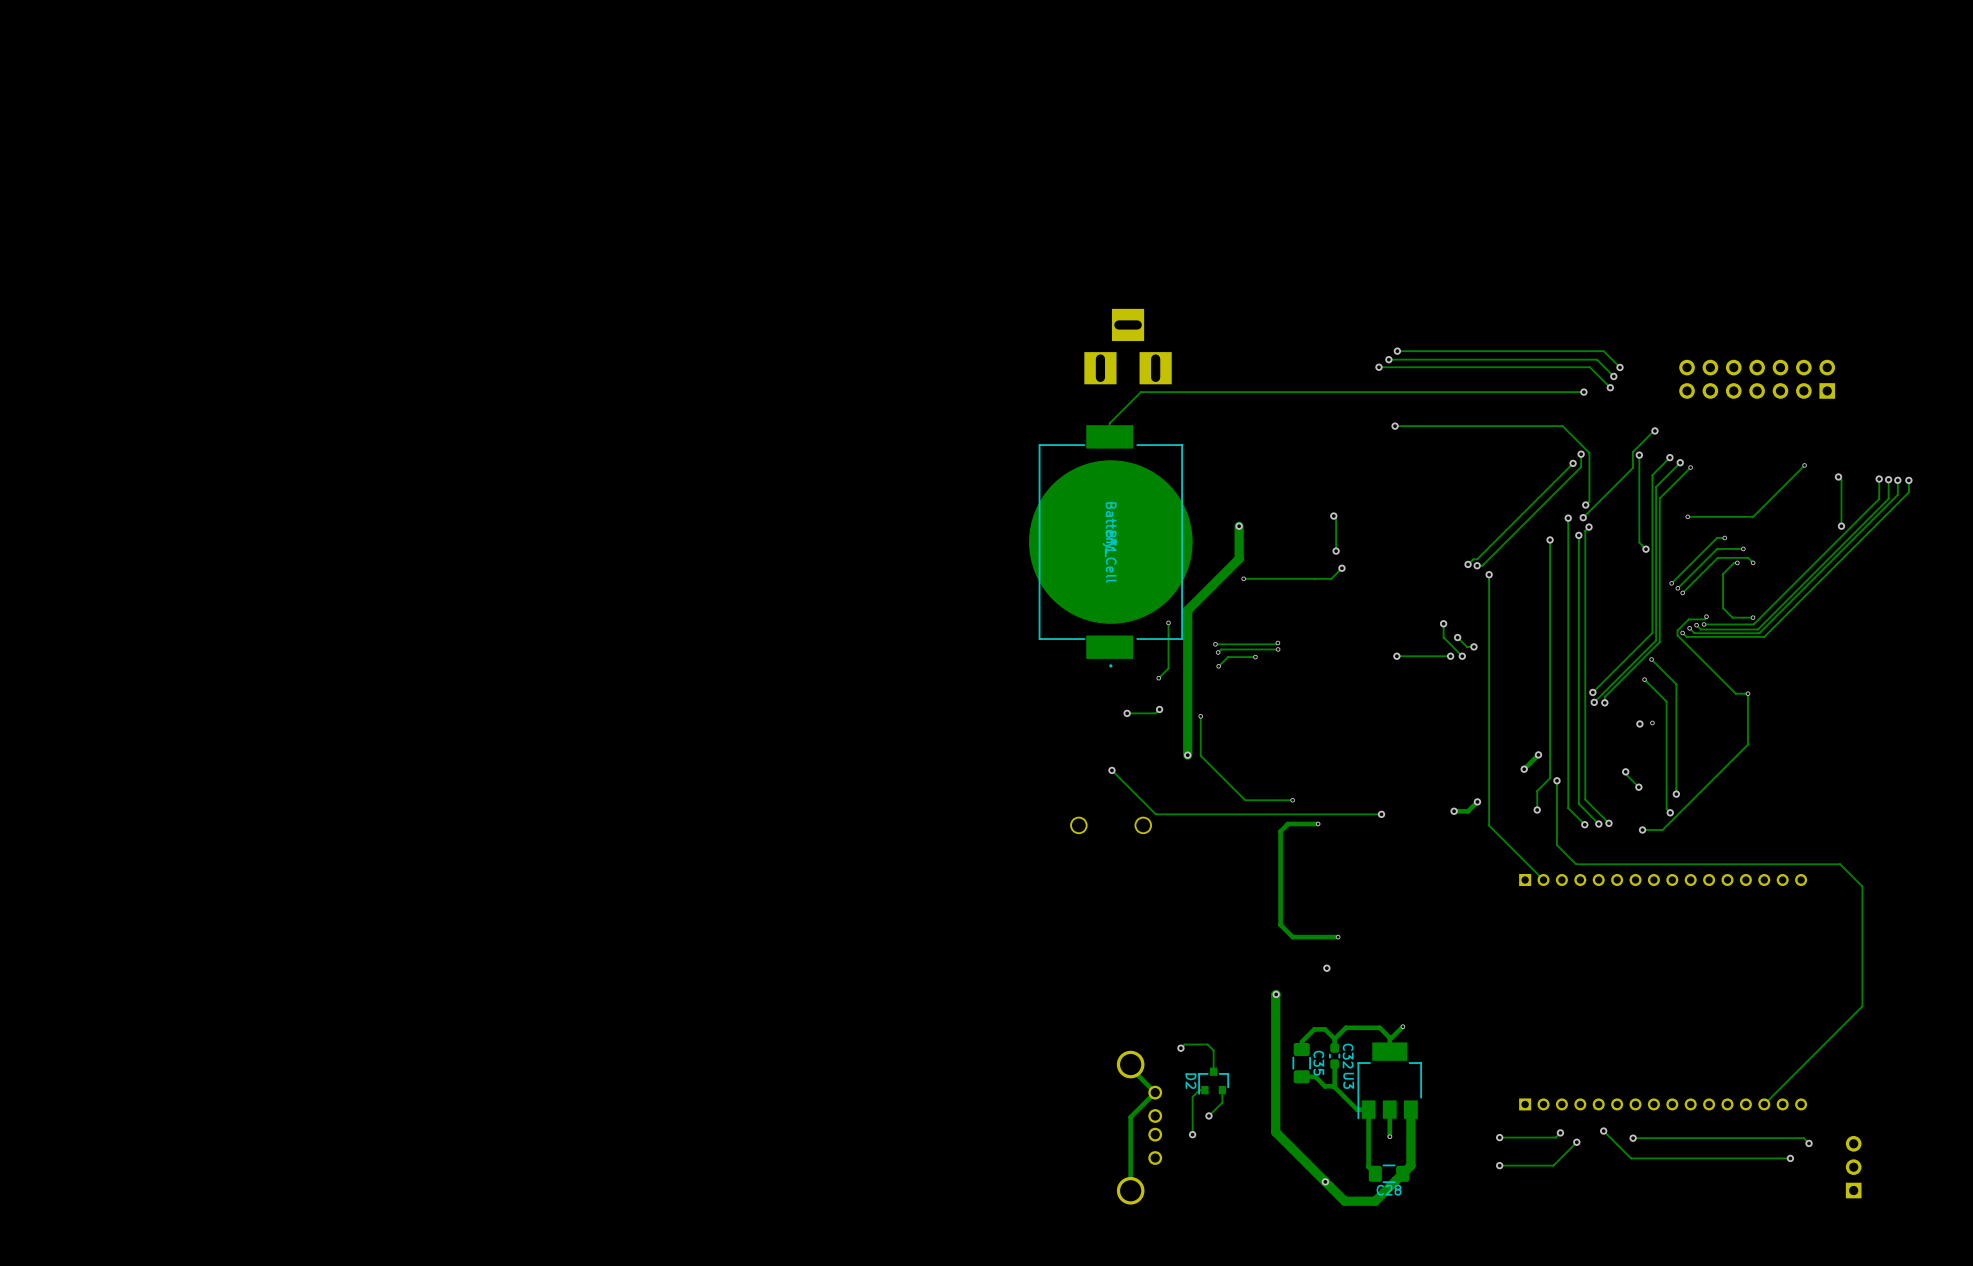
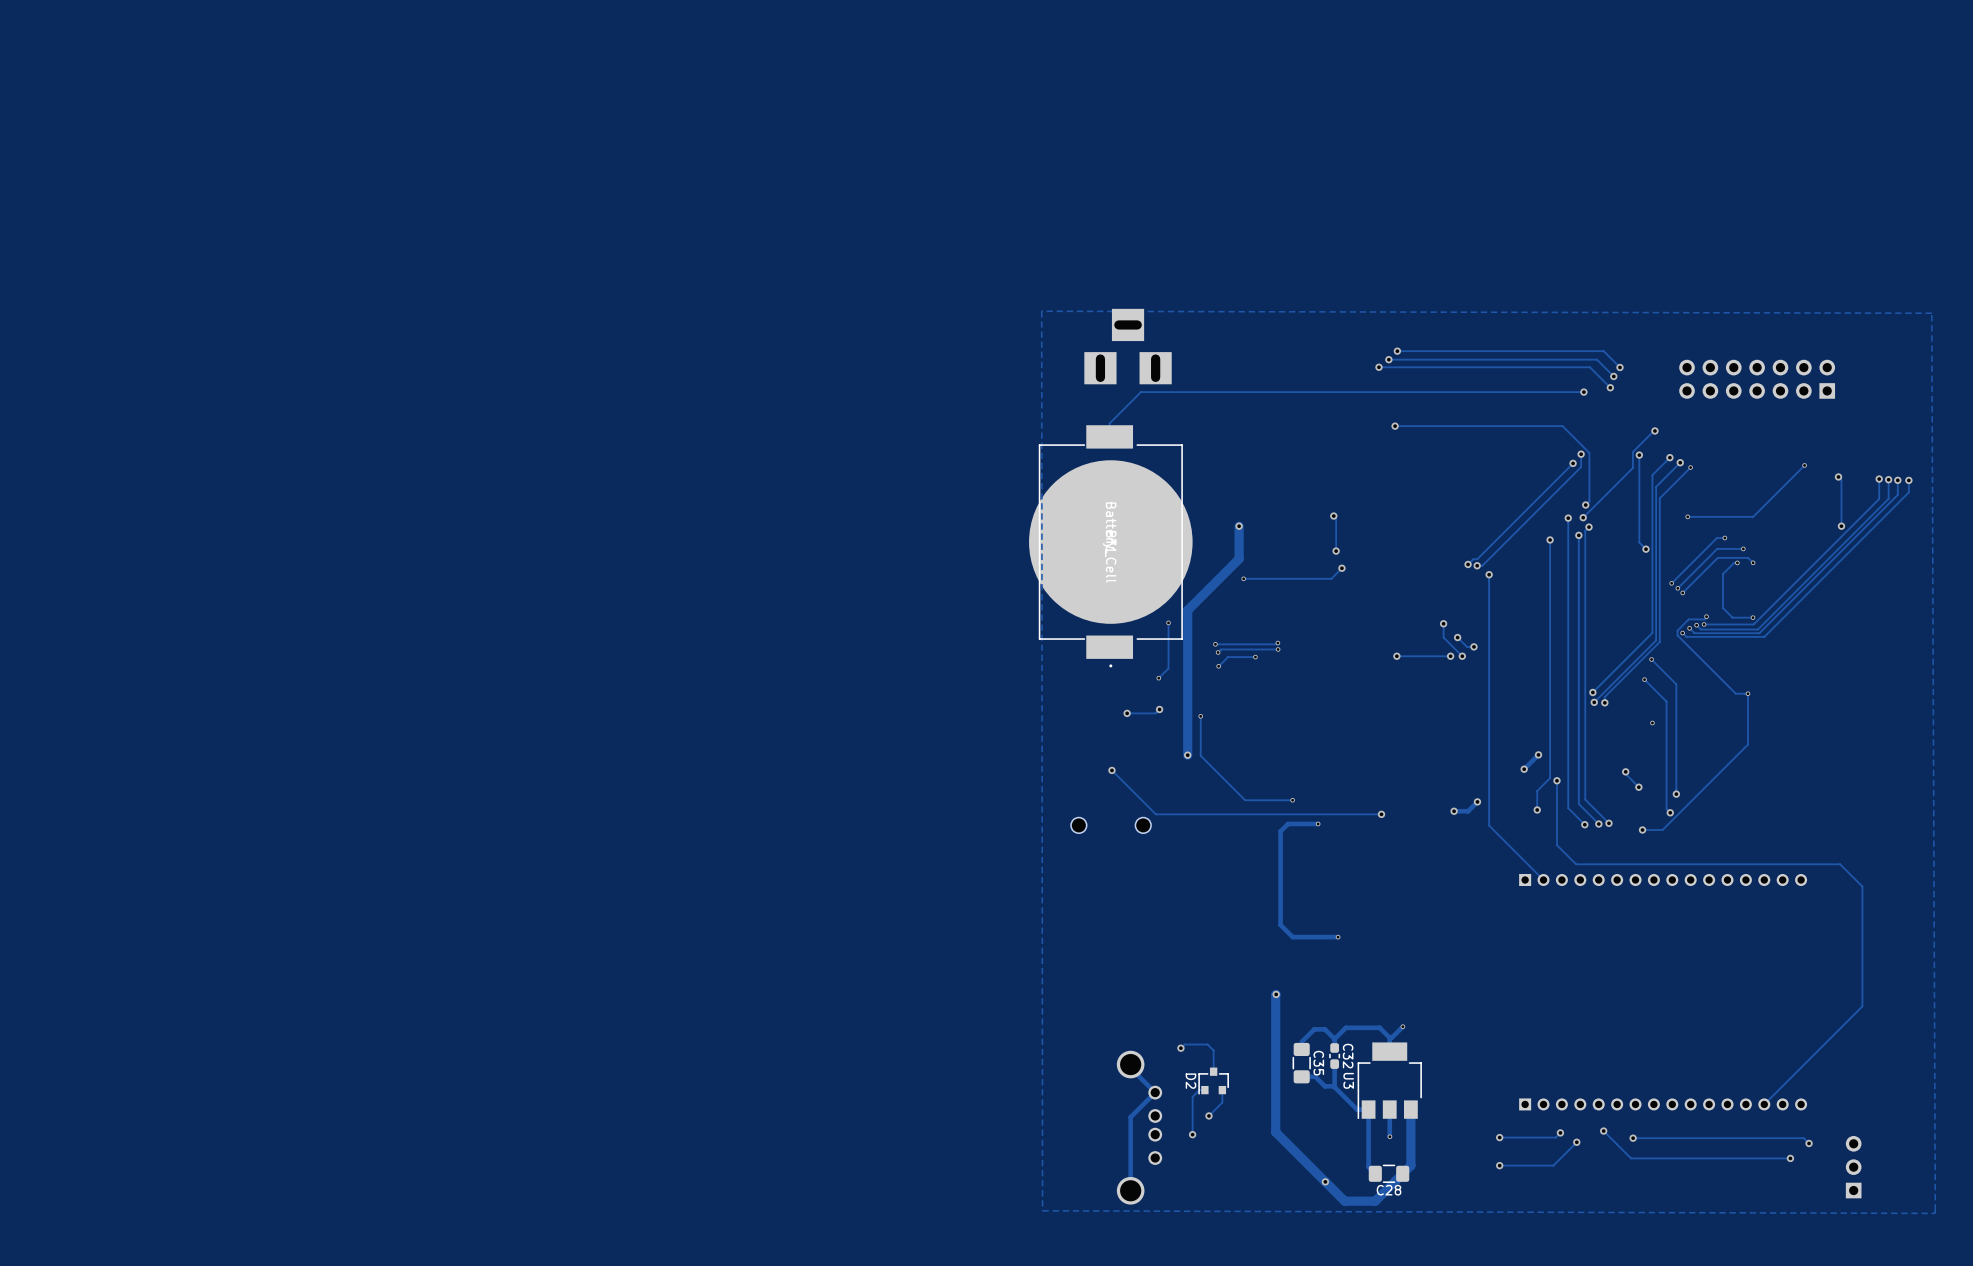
zone outline: none -> (1041, 311) (1931, 313) (1935, 1213) (1042, 1210) (1041, 311)
via: (1639, 724) -> none
via: (1326, 968) -> none

